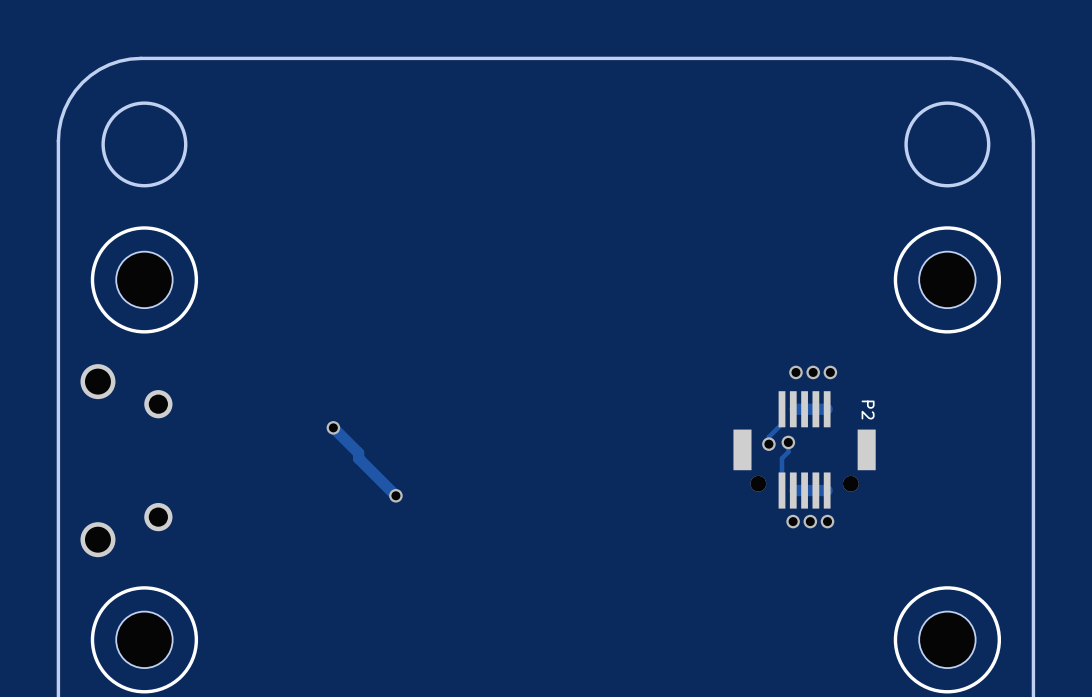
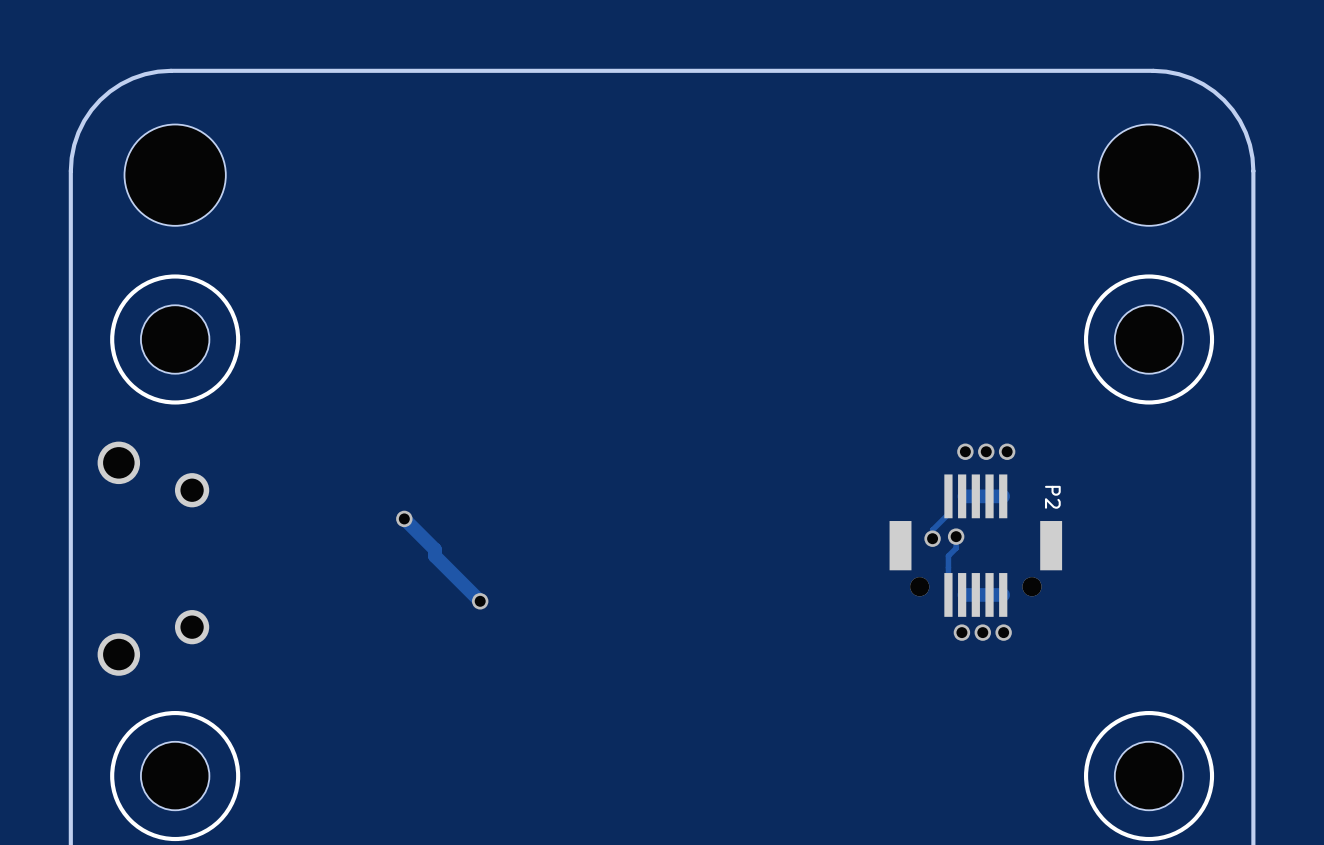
round board edge: [101, 101, 188, 188] -> none
round board edge: [904, 101, 991, 188] -> none
part: none -> (175, 175)
part: none -> (1149, 175)

